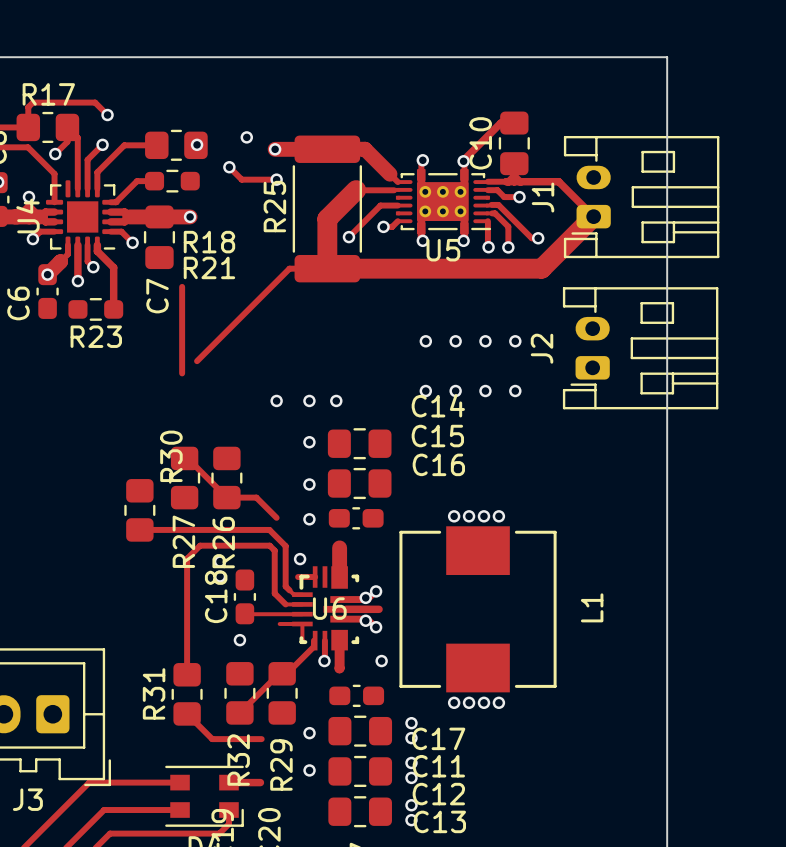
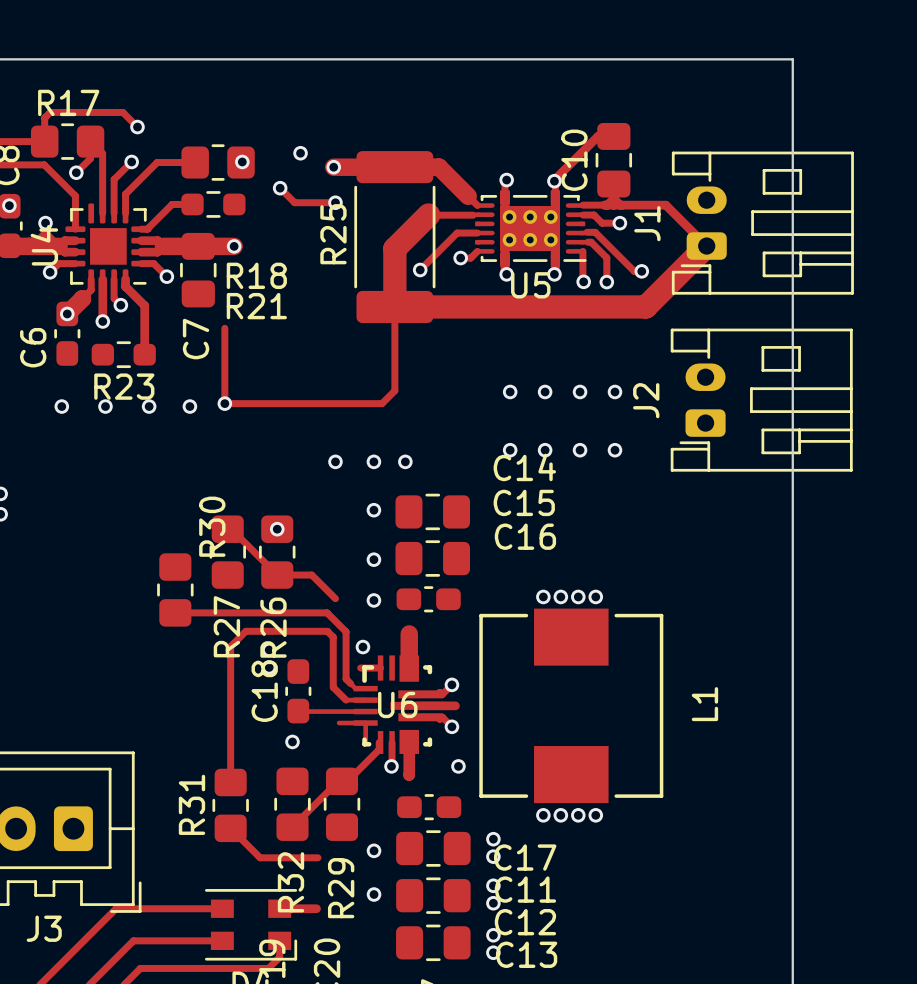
track: (327, 268) (289, 268) (197, 361) -> (394, 306) (394, 390) (382, 403) (224, 403)
track: (182, 351) (182, 373) -> none
via: none -> (224, 403)
via: none -> (61, 406)
via: none -> (105, 406)
via: none -> (149, 406)
via: none -> (189, 406)
via: none -> (277, 529)
via: (365, 597) -> none
via: (365, 620) -> none

